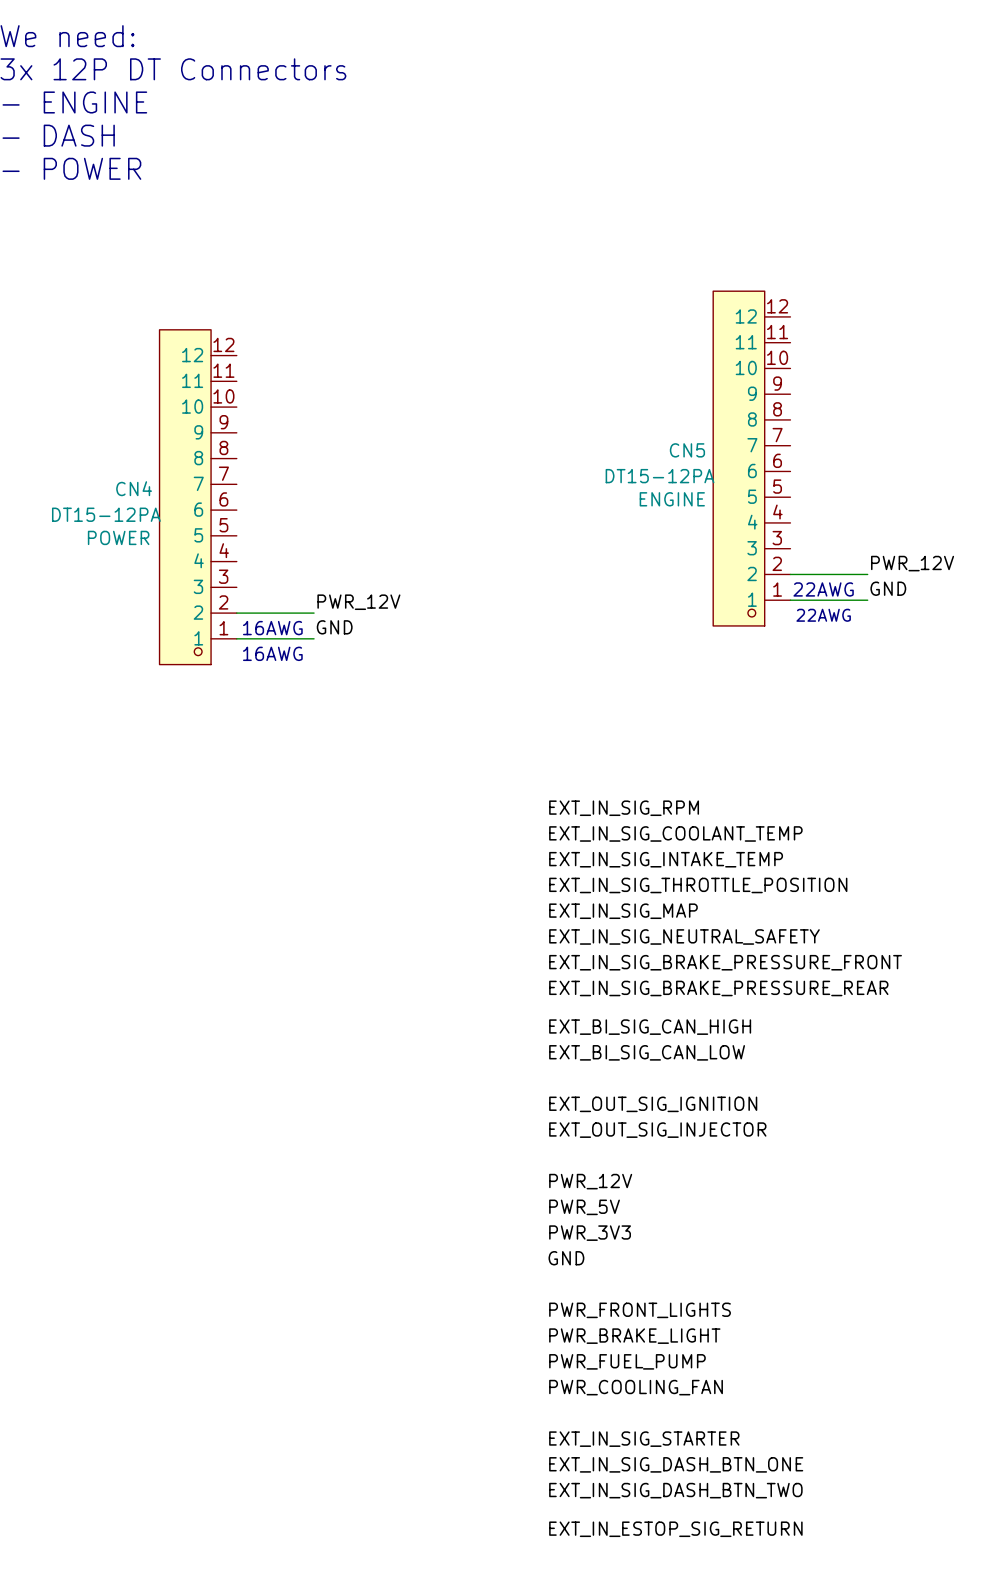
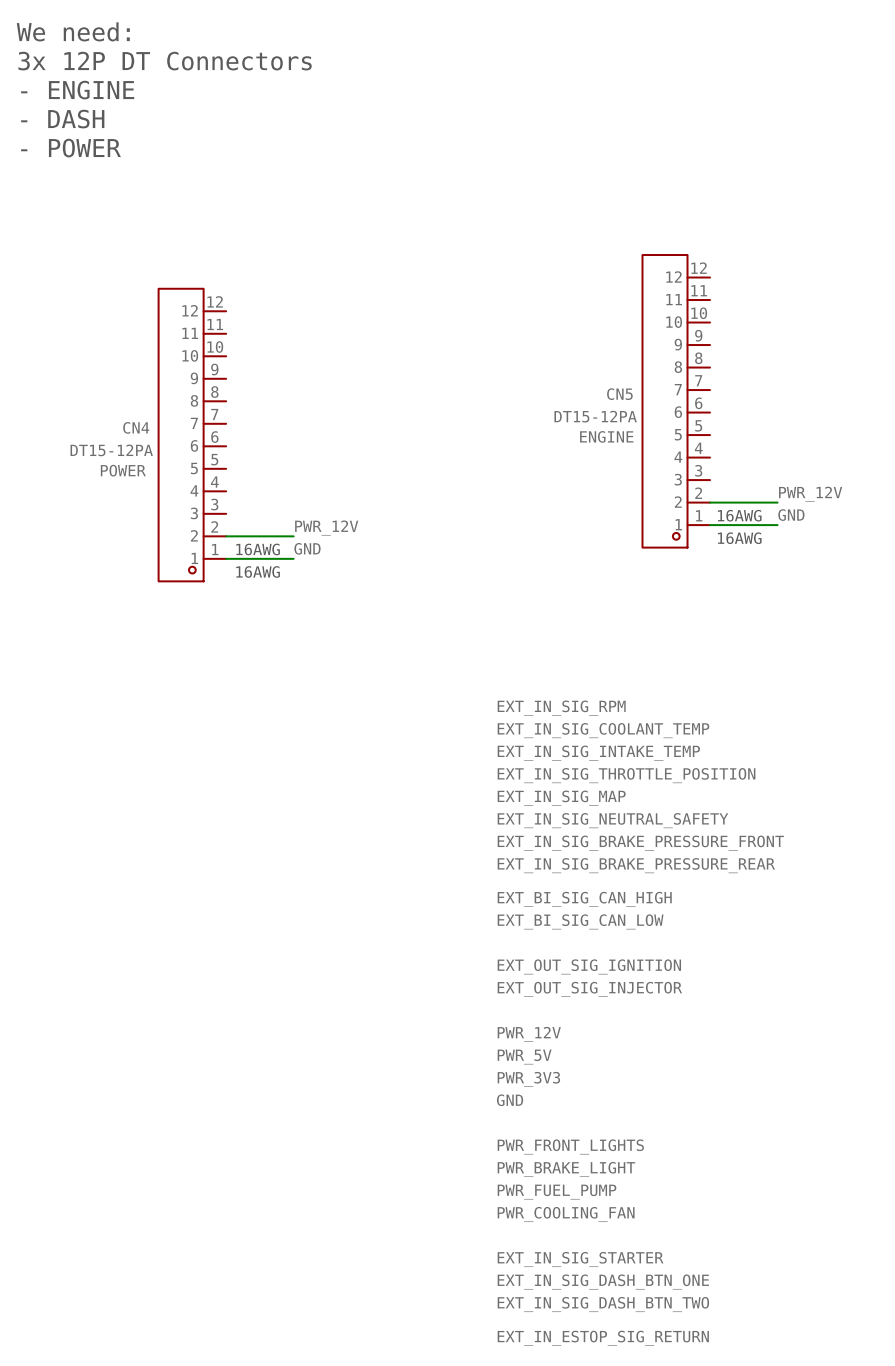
text: 22AWG (823, 589) -> 16AWG (739, 515)
text: 22AWG (823, 615) -> 16AWG (739, 538)

